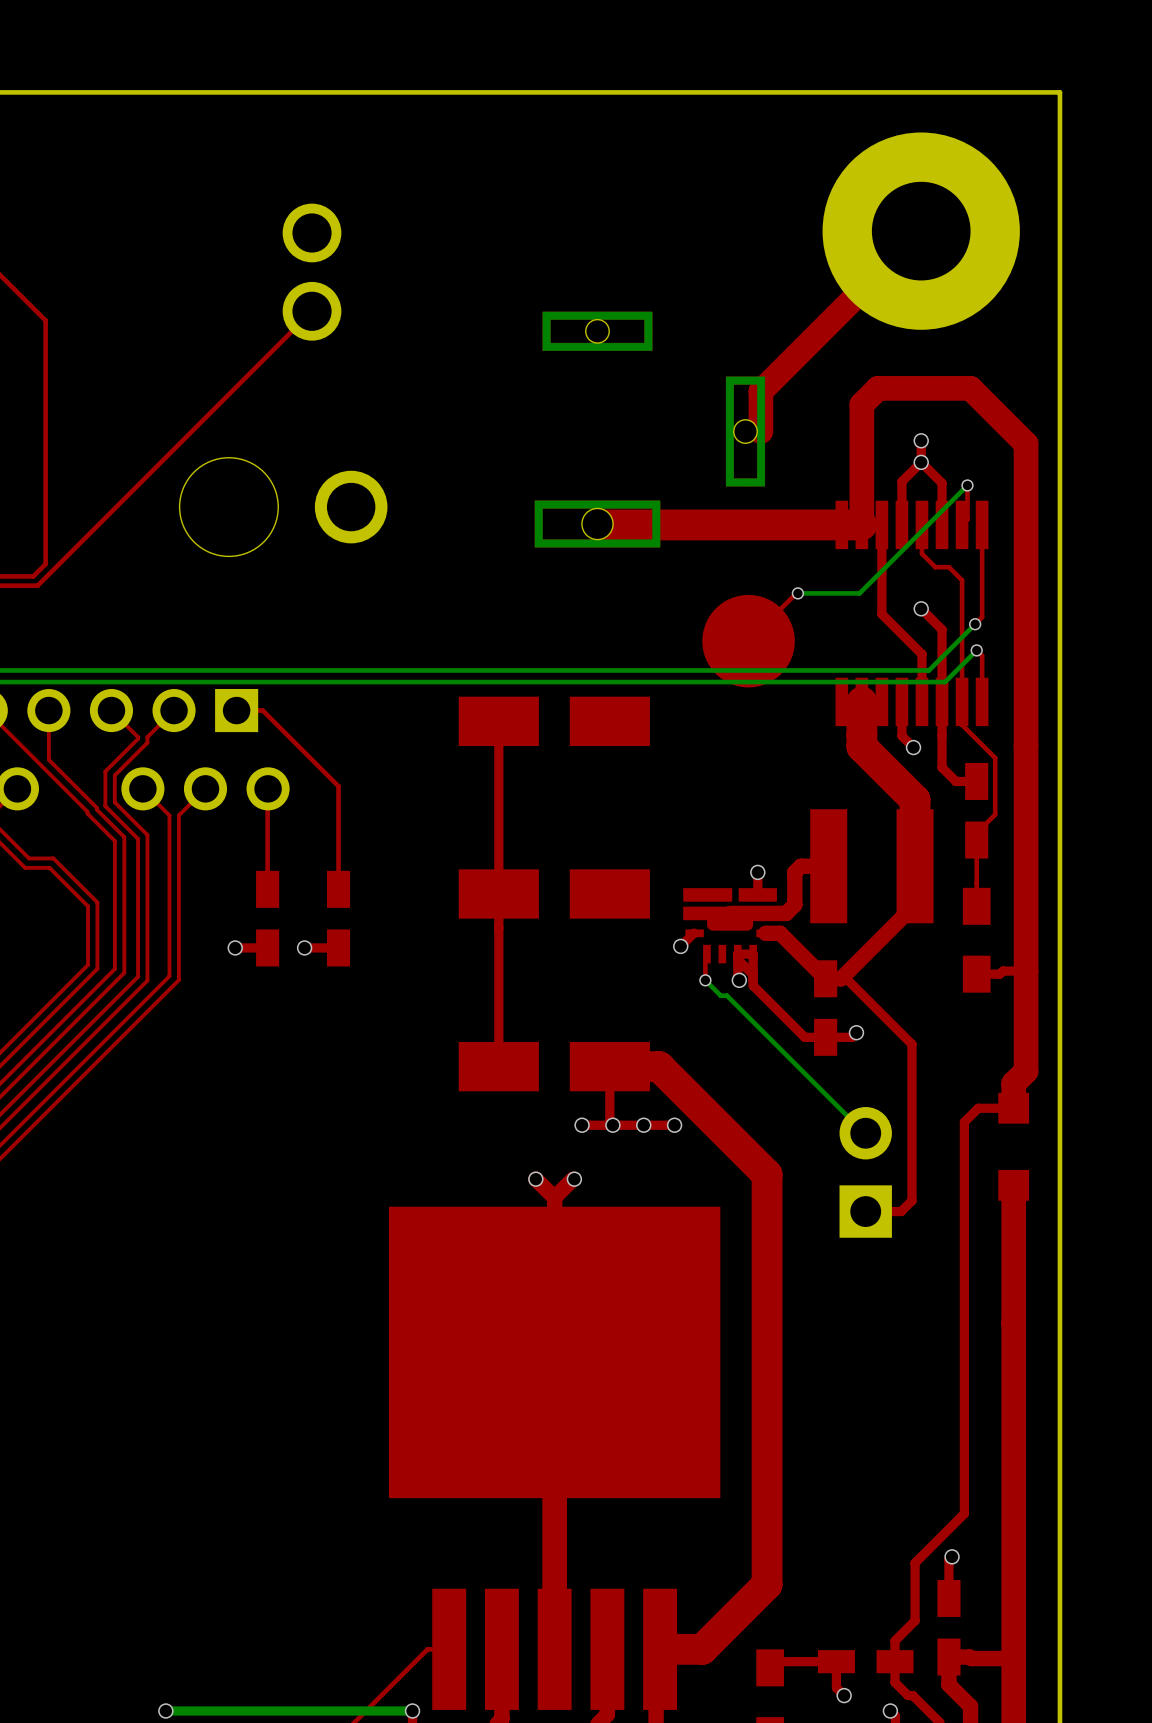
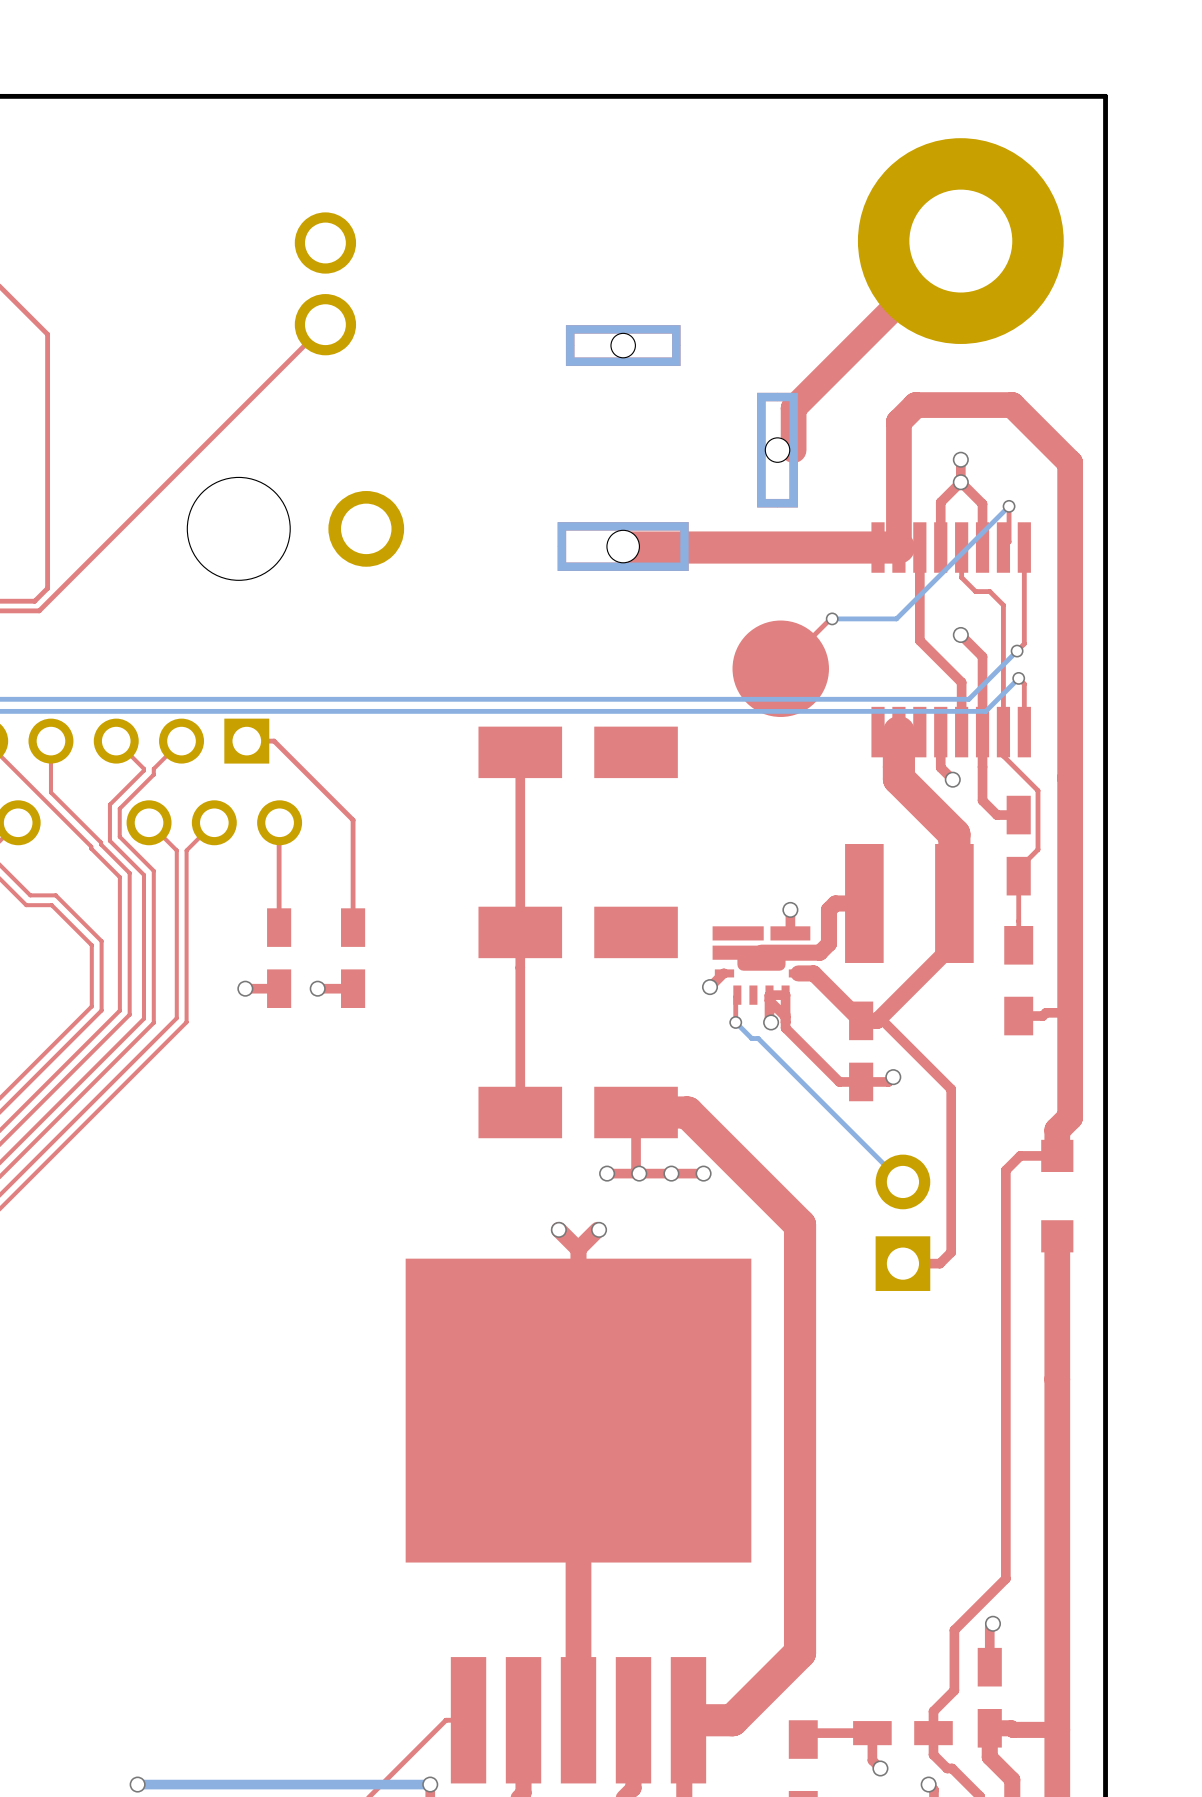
via: none -> (137, 1784)
bottom track: none -> (173, 1784) (137, 1784)
via: (165, 1711) -> none

